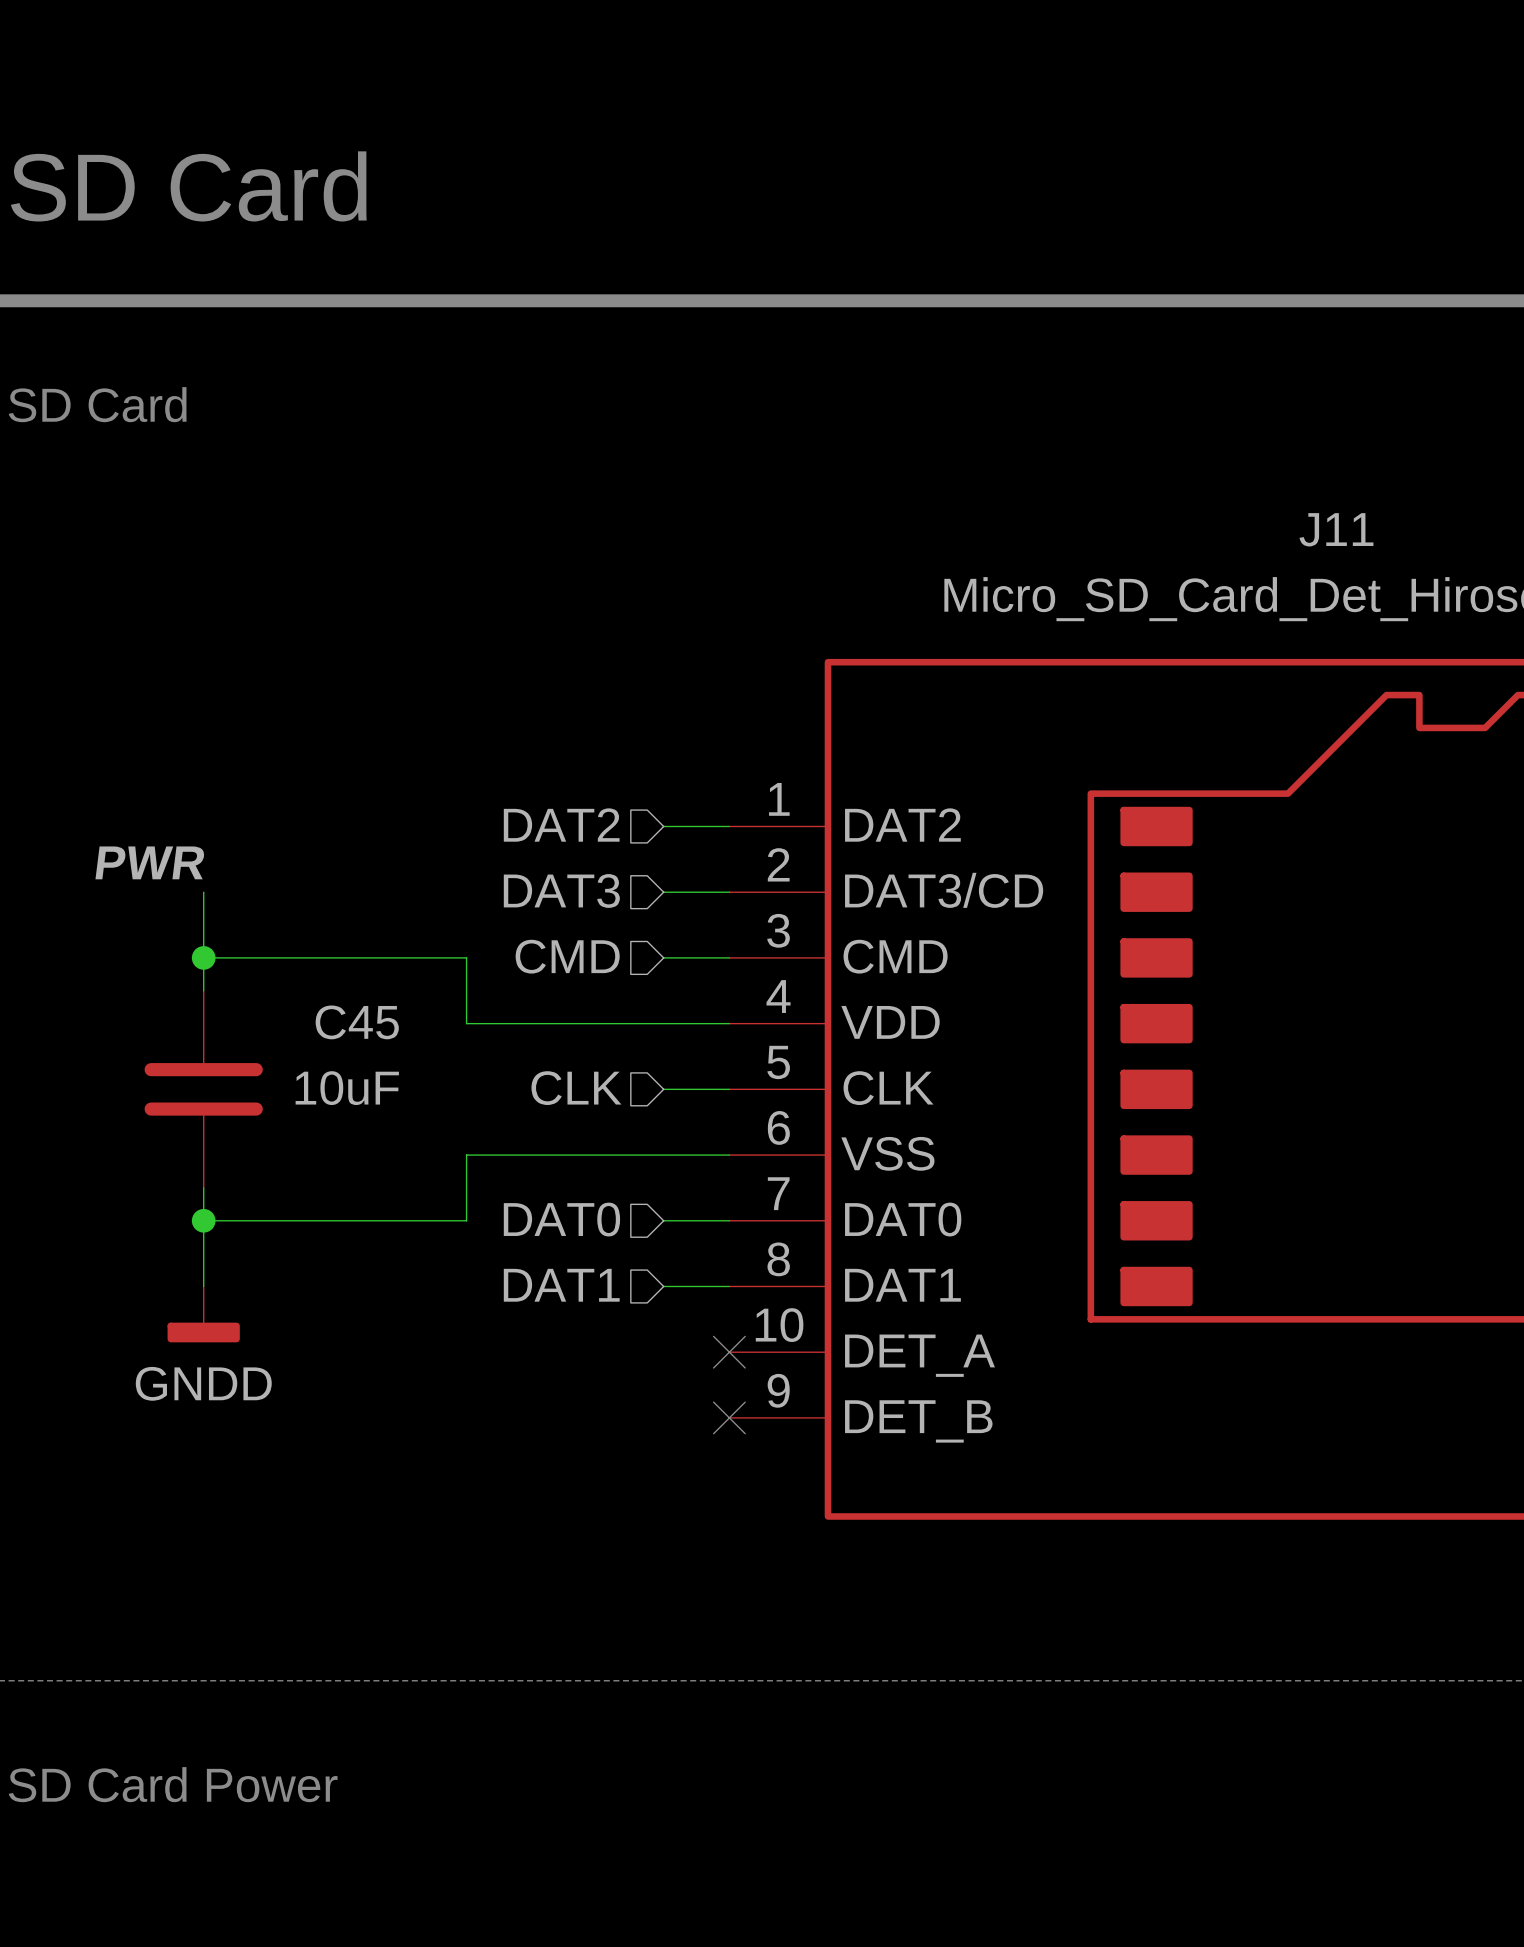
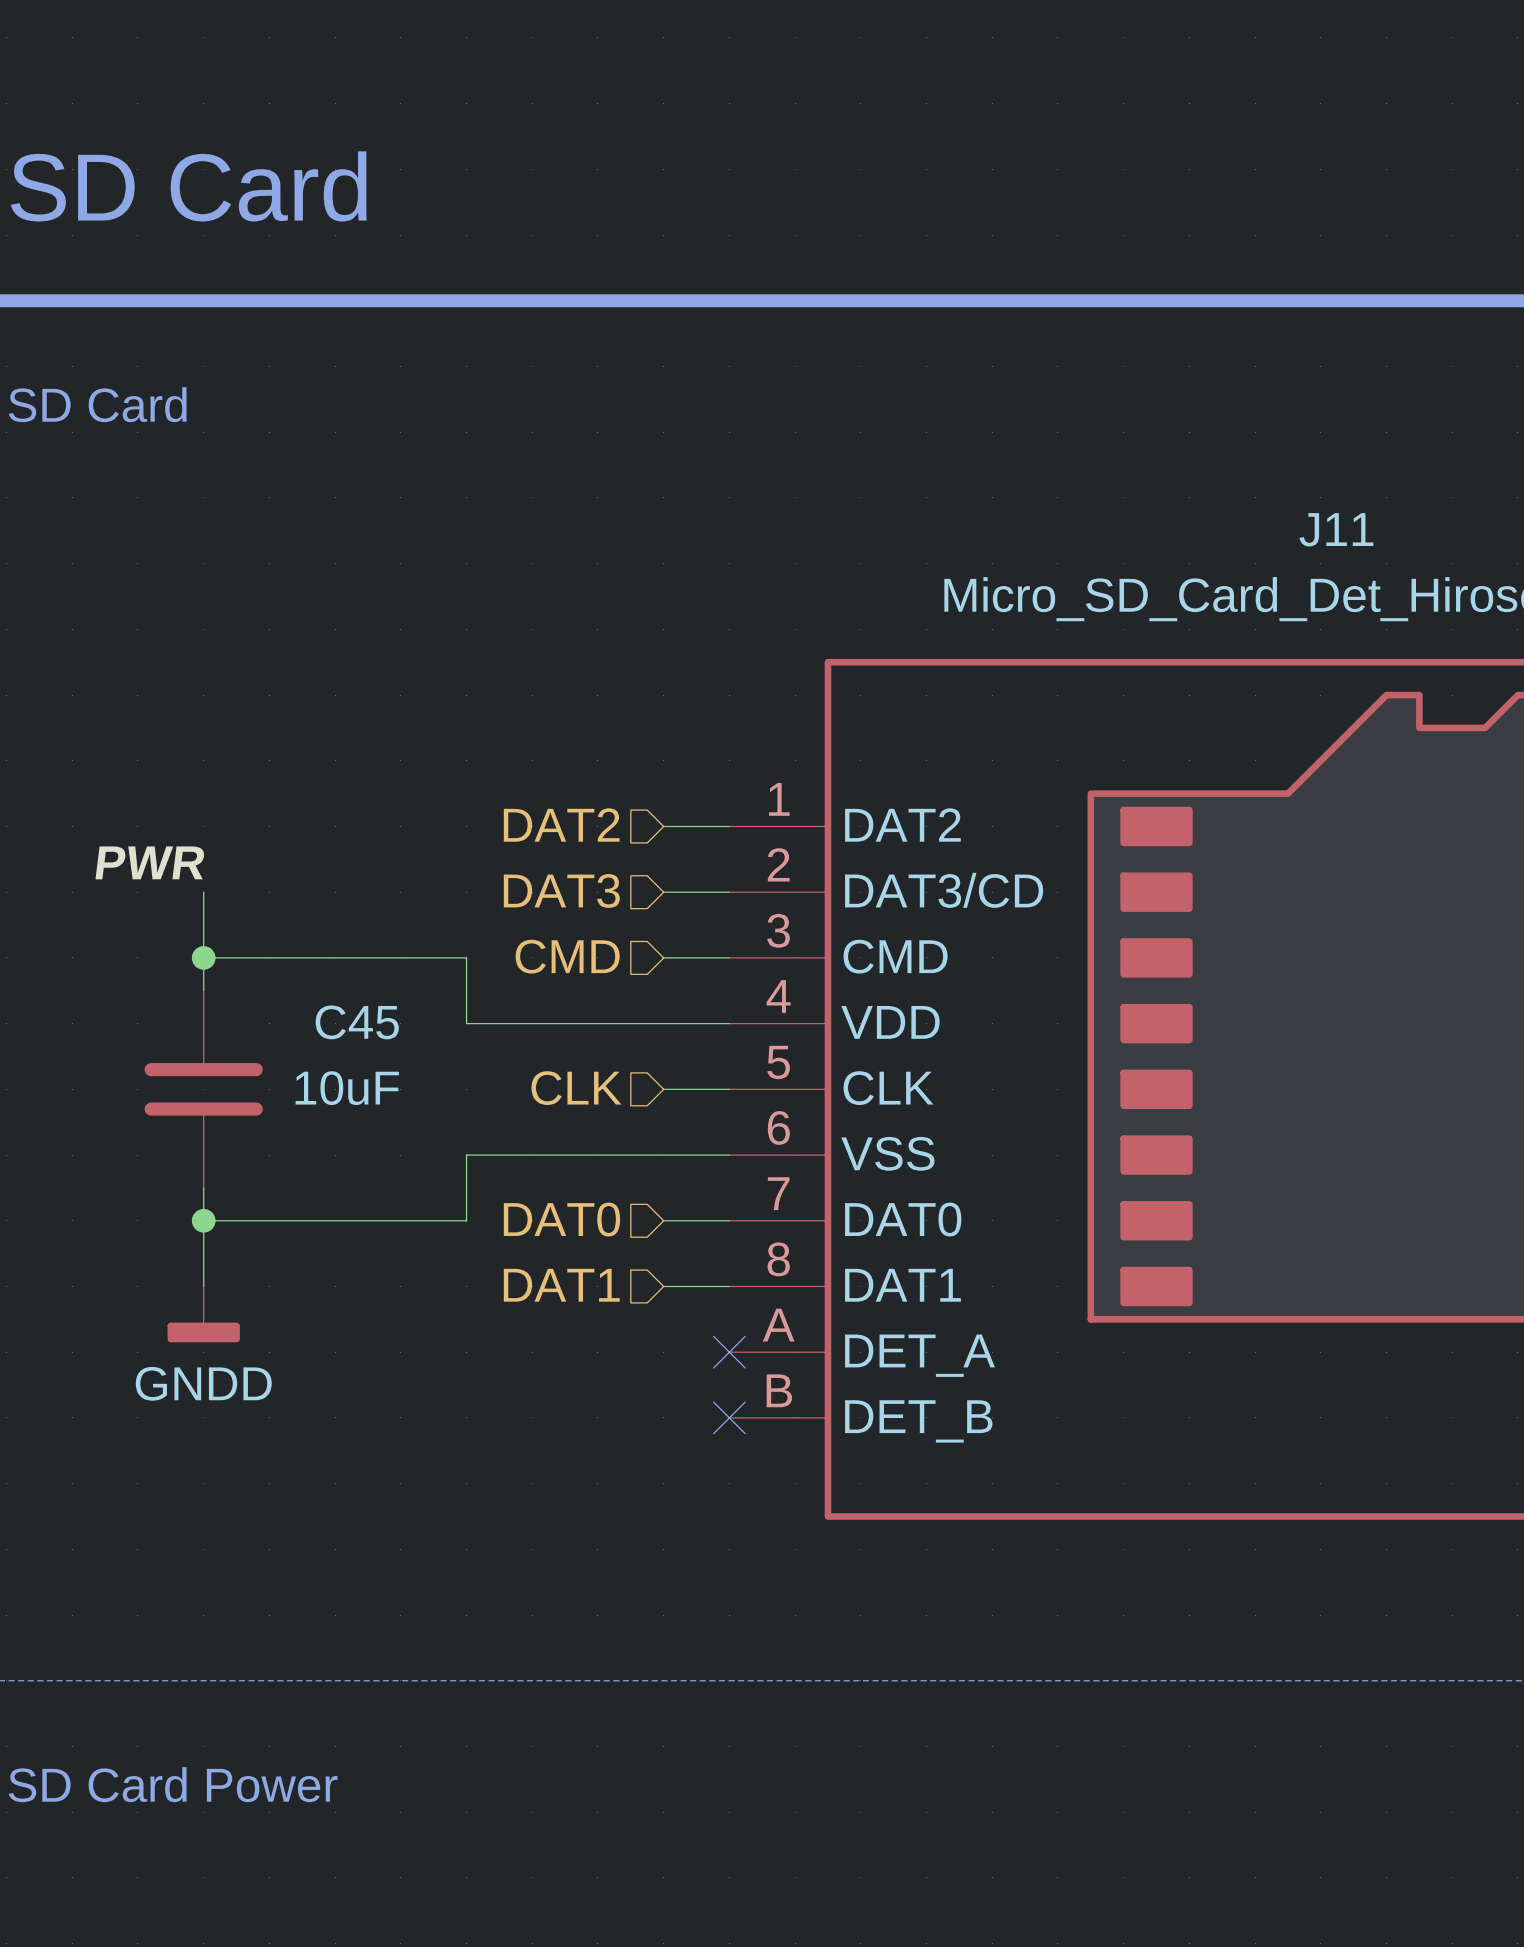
J11 pin number: 10 (779, 1325) -> A (778, 1325)
J11 pin number: 9 (778, 1390) -> B (779, 1390)

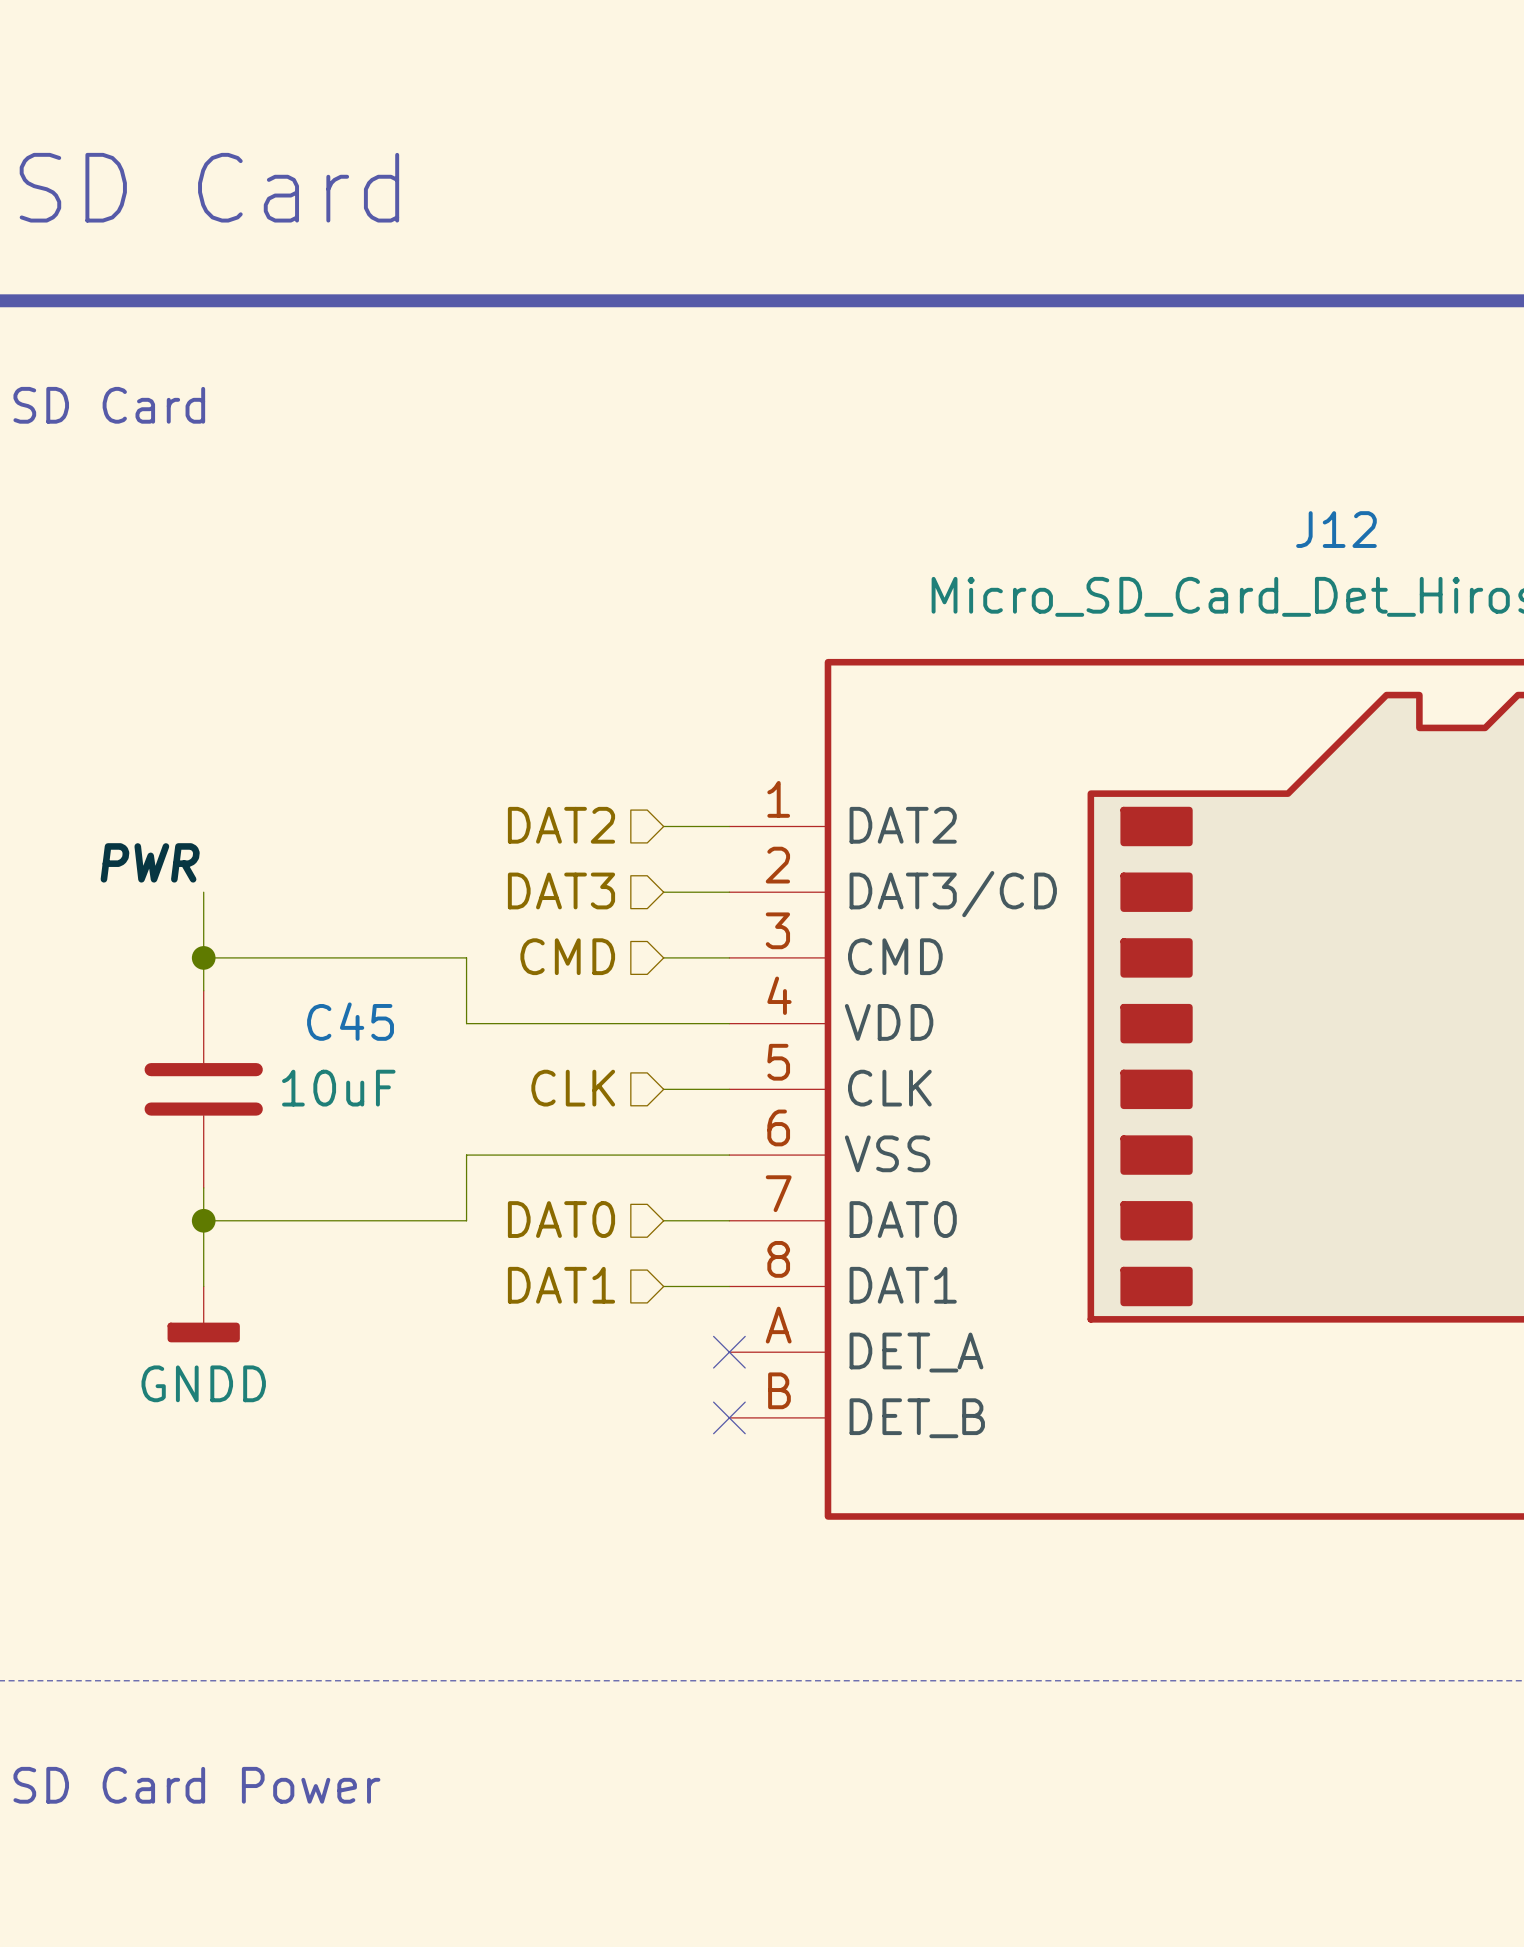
J11 name: J11 (1336, 529) -> J12 (1336, 529)

